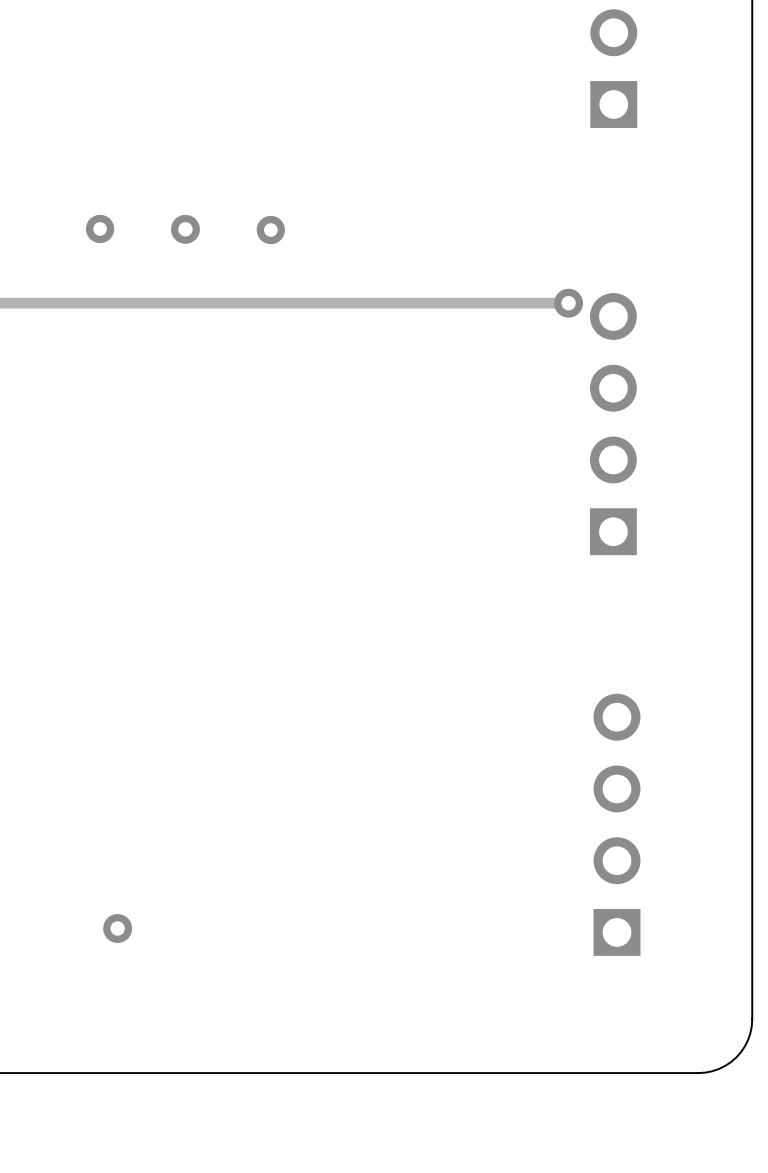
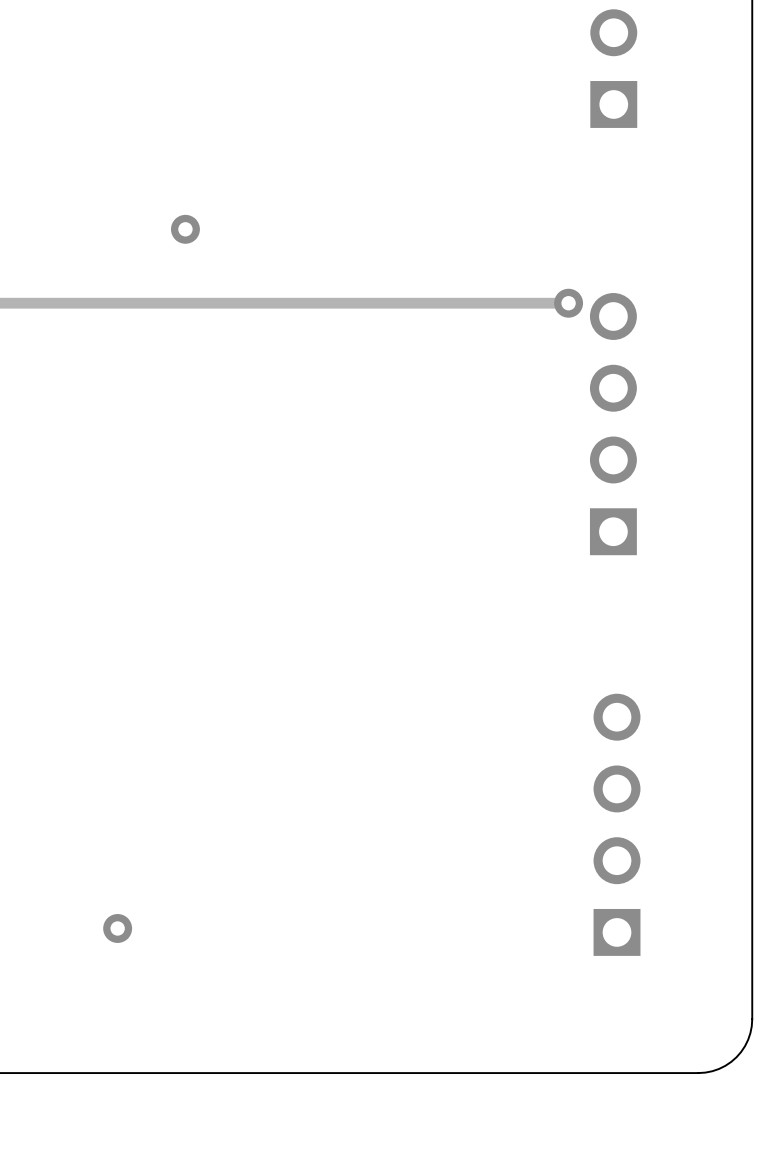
via: (100, 228) -> none
via: (270, 230) -> none

